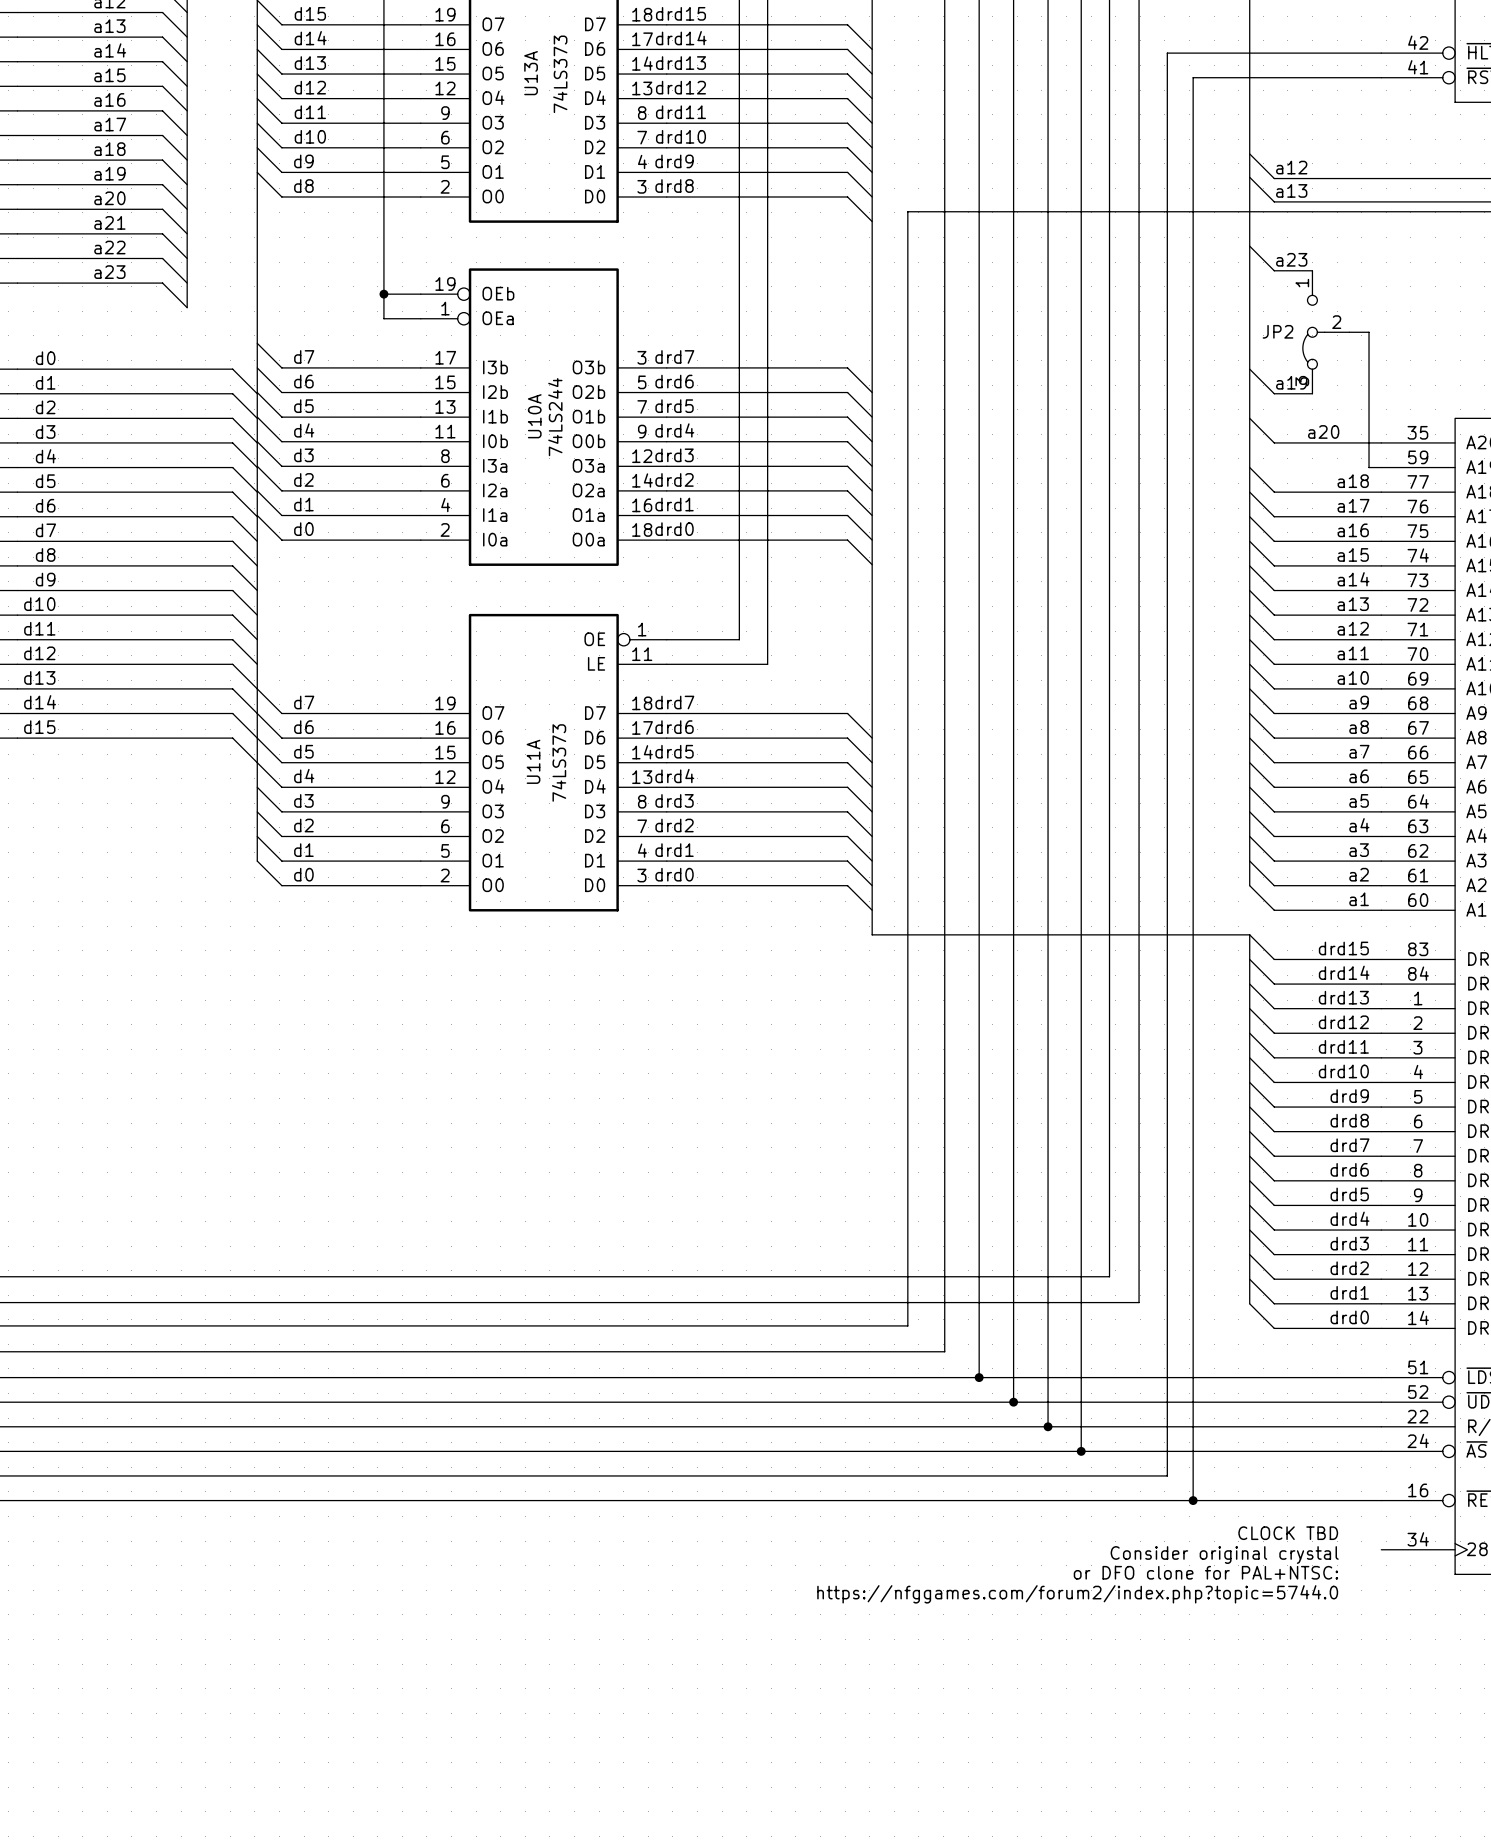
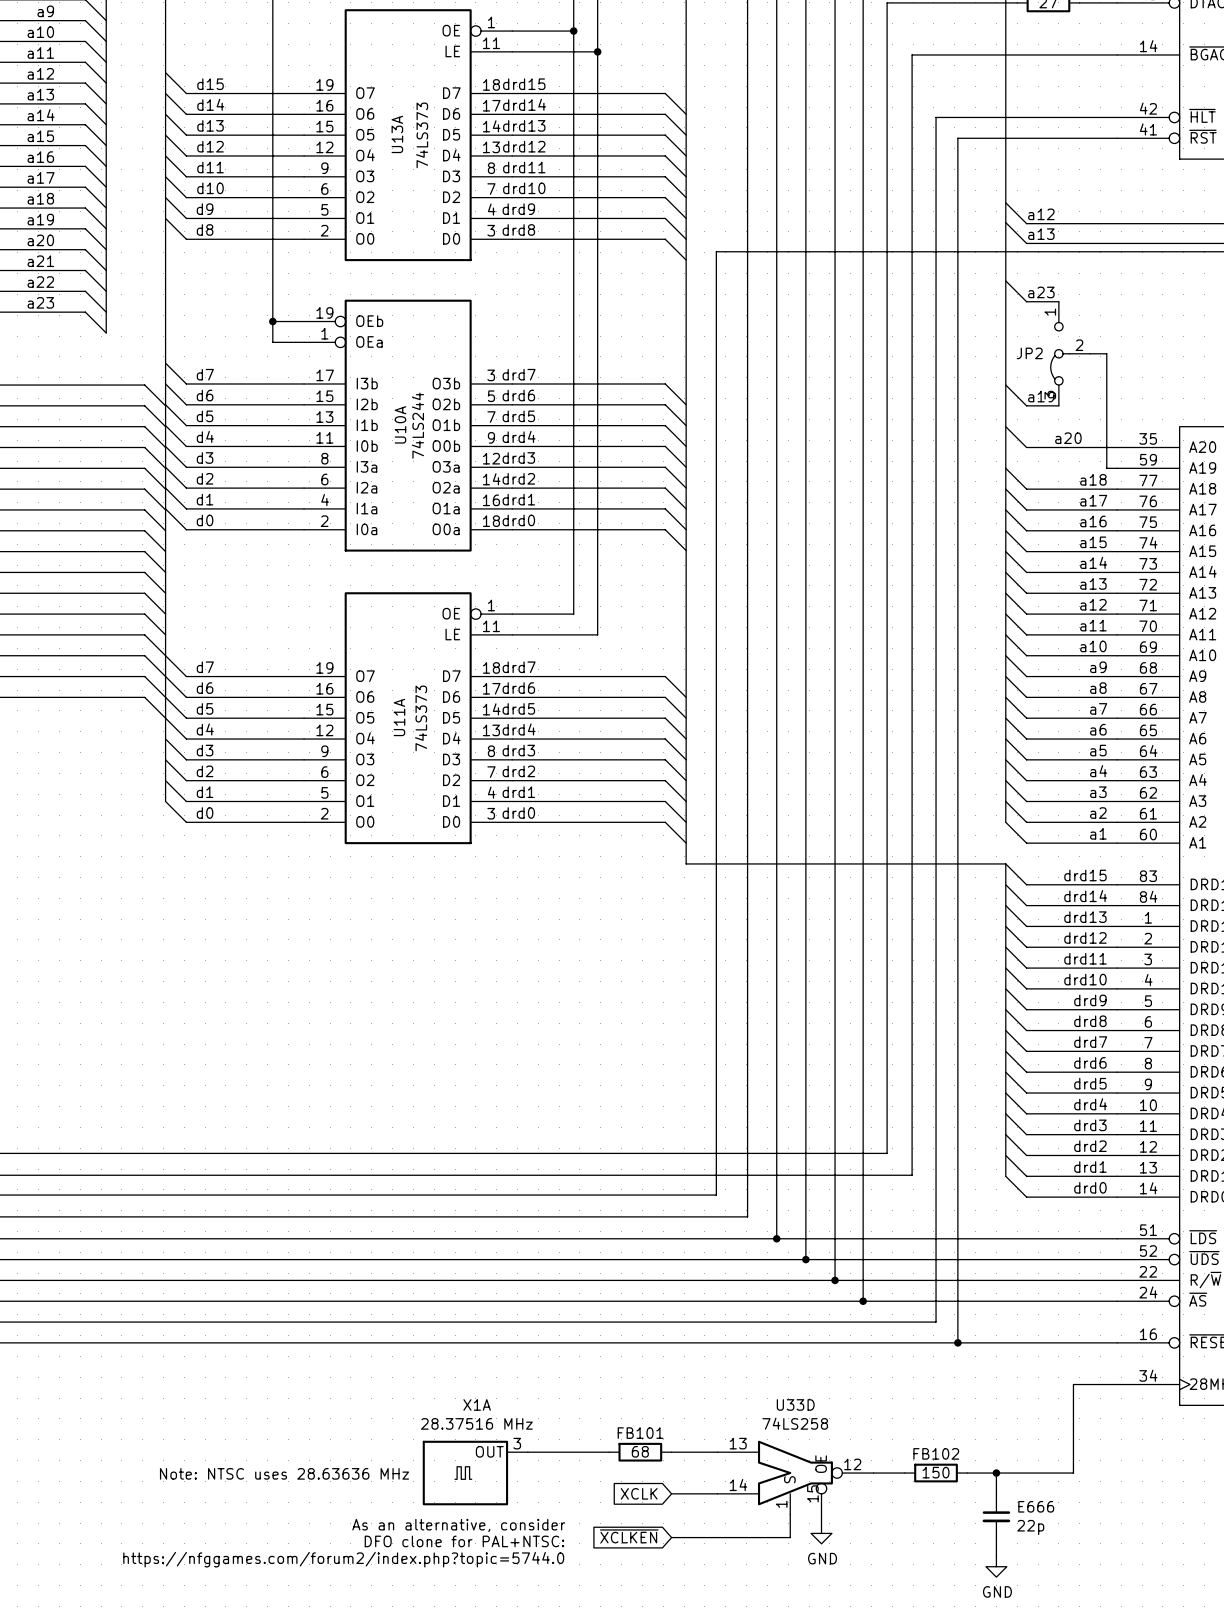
text: CLOCK TBD (1288, 1533) -> none
wire: none -> (1117, 1384) (1073, 1384) (1073, 1473) (967, 1473)
text: Consider original crystal (1224, 1555) -> none
text: or DFO clone for PAL+NTSC: (1205, 1572) -> none
text: https://nfggames.com/forum2/index.php?topic=5744.0 (1077, 1594) -> none
wire: none -> (527, 1452) (609, 1452)
FB101: none -> 68 (640, 1452)
wire: none -> (671, 1452) (717, 1452)
X1A: none -> 28.37516 MHz (475, 1473)
wire: none -> (873, 1473) (904, 1473)
FB102: none -> 150 (936, 1473)
wire: none -> (996, 1473) (996, 1495)
junction: none -> (996, 1473)
text: none -> Note: NTSC uses 28.63636 MHz (284, 1473)
U33D: none -> 74LS258 (795, 1477)
global label: none -> XCLK (639, 1493)
wire: none -> (671, 1493) (717, 1493)
wire: none -> (821, 1504) (821, 1523)
wire: none -> (790, 1514) (790, 1537) (671, 1537)
E666: none -> 22p (996, 1516)
text: none -> As an alternative, consider (458, 1525)
power symbol: none -> GND (821, 1533)
global label: none -> ~{XCLKEN} (629, 1536)
wire: none -> (996, 1537) (996, 1556)
text: none -> DFO clone for PAL+NTSC: (464, 1541)
text: none -> https://nfggames.com/forum2/index.php?topic=5744.0 (343, 1559)
power symbol: none -> GND (996, 1566)

